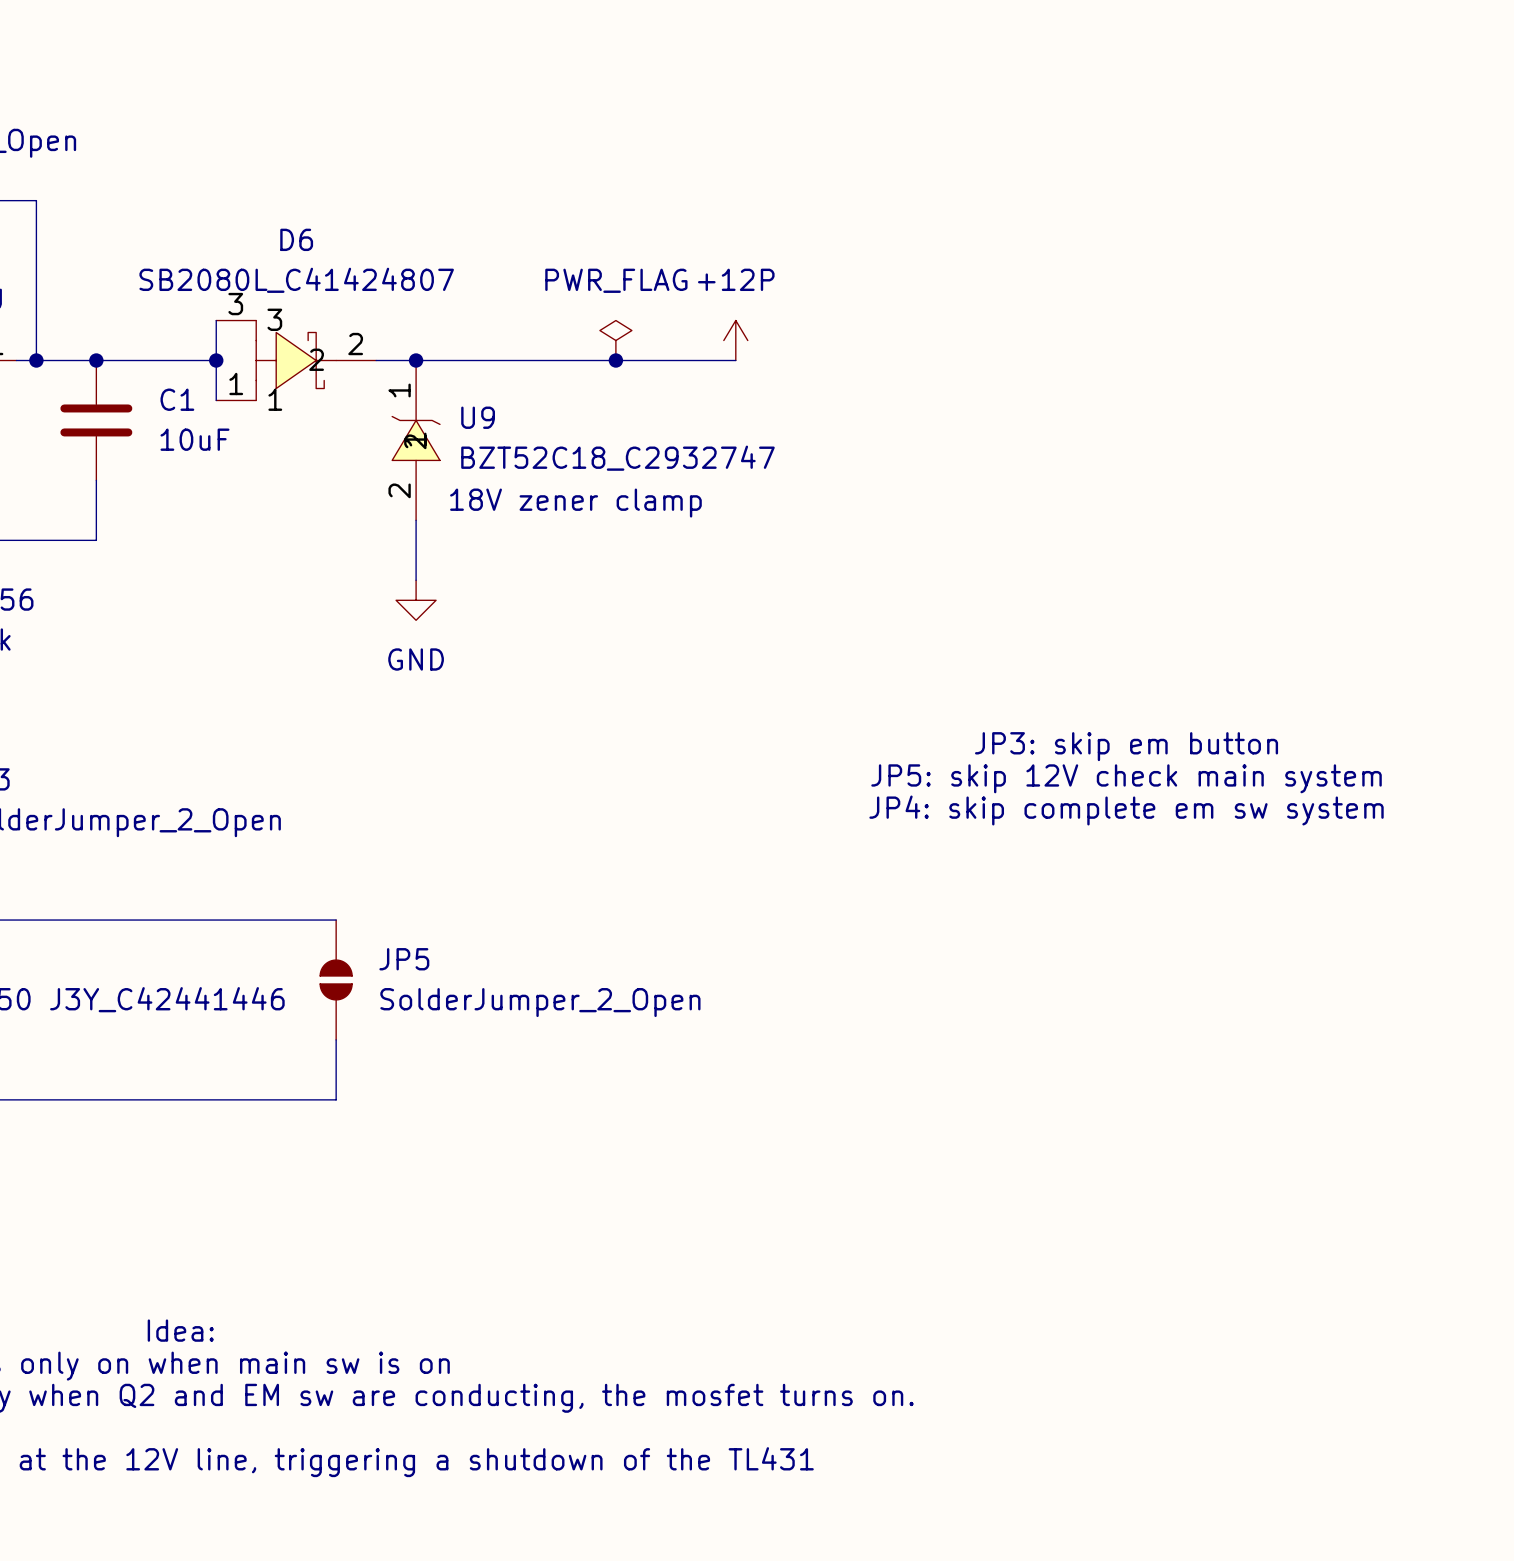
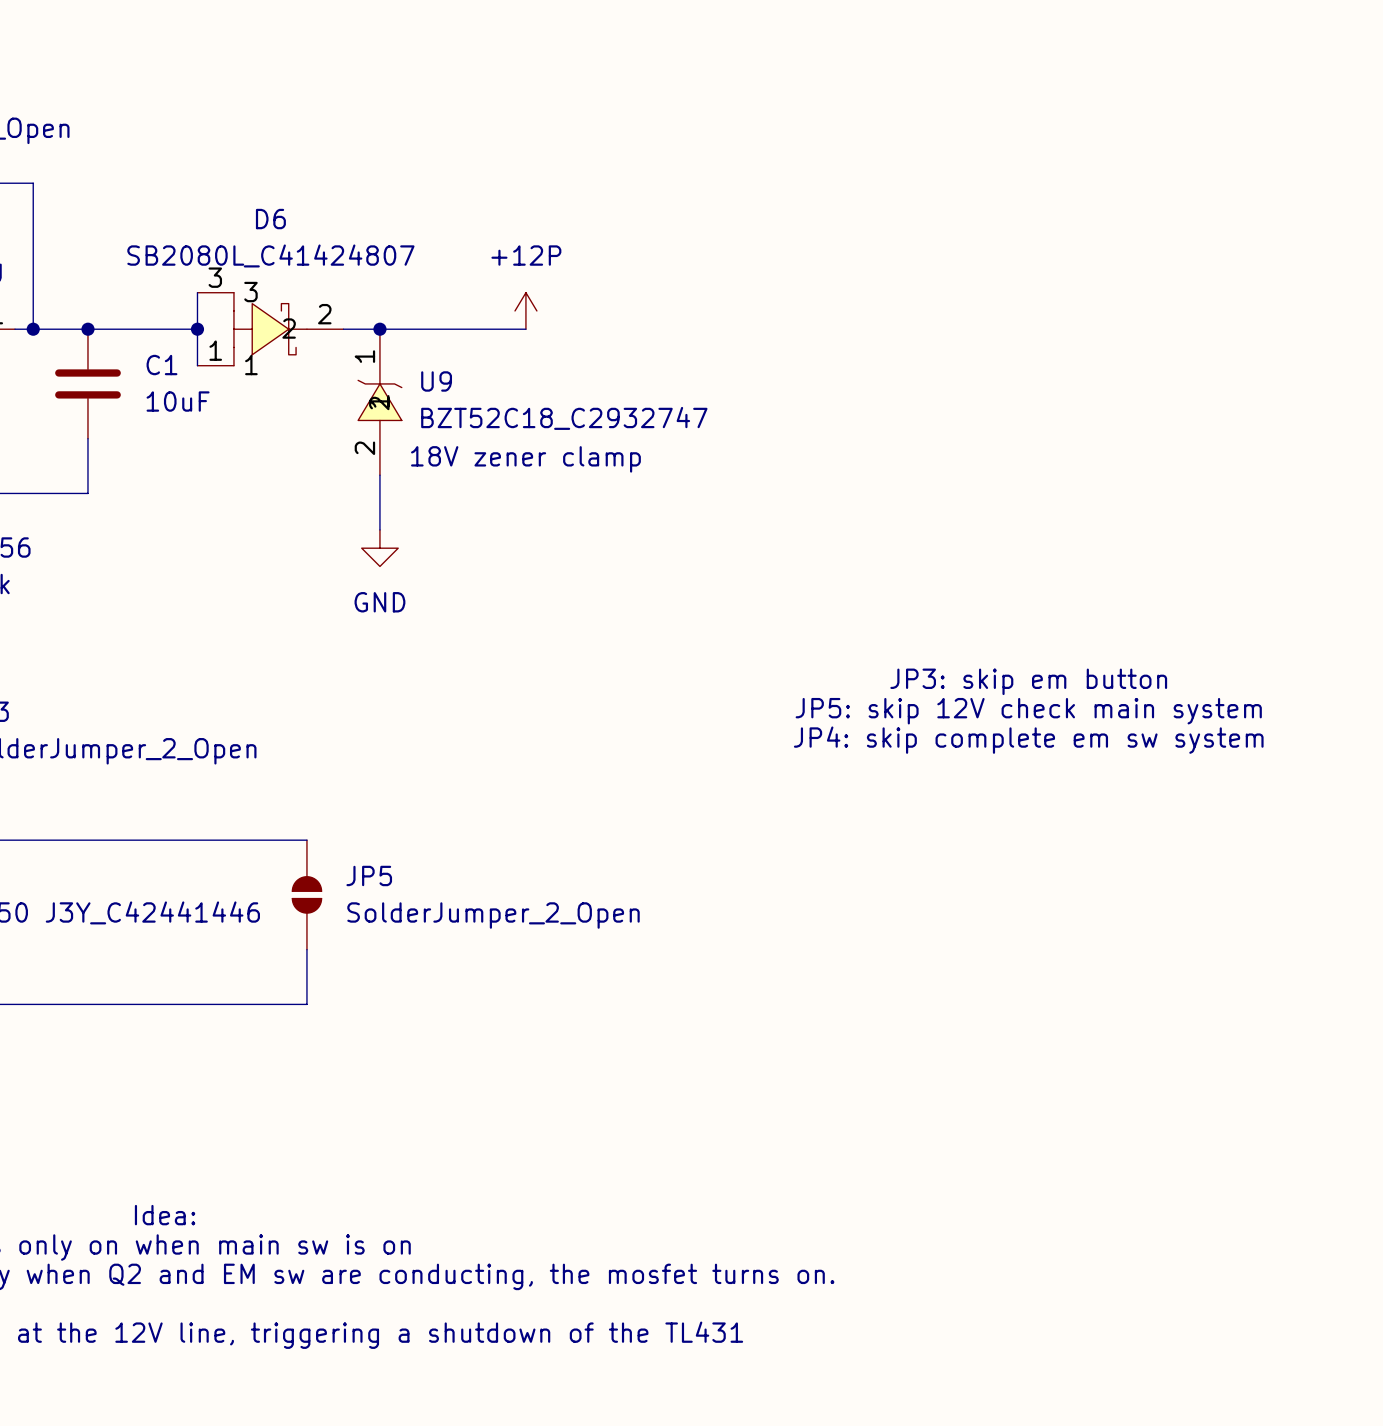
power symbol: PWR_FLAG (615, 340) -> none
power symbol position: +12P (735, 340) -> +12P (525, 310)
wire: (575, 360) (735, 360) -> none
junction: (615, 360) -> none

